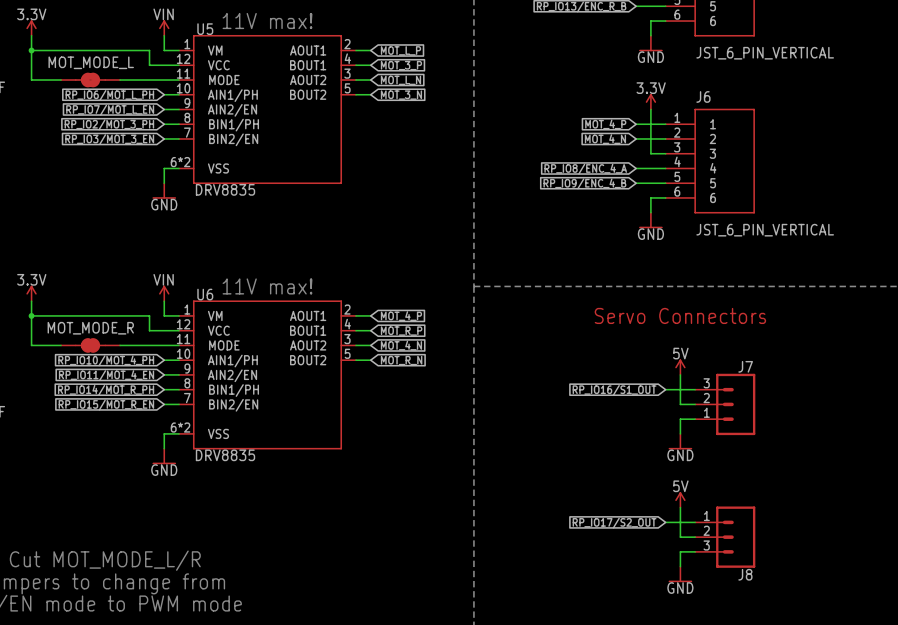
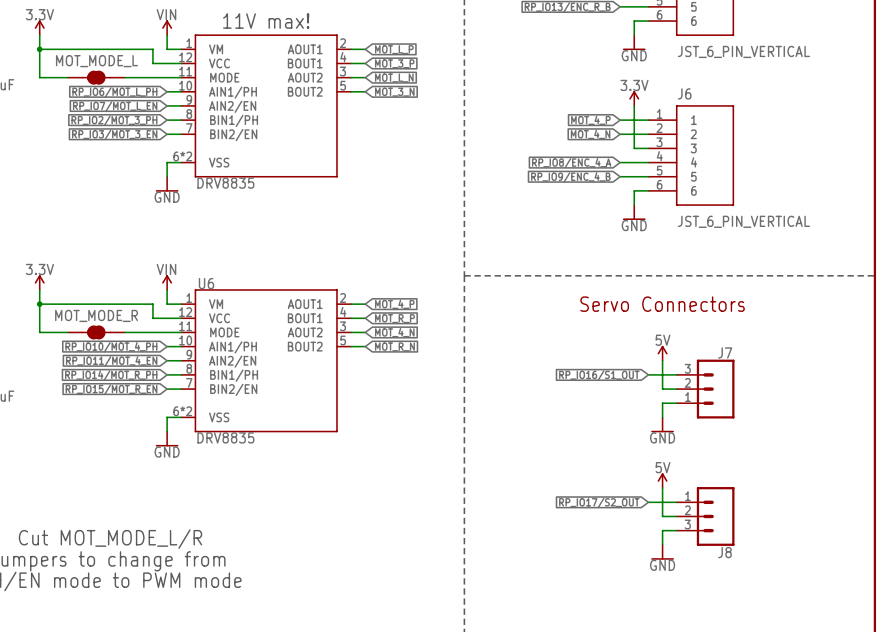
U5 name: U5 (205, 29) -> none
text: 11V max! (267, 286) -> none

